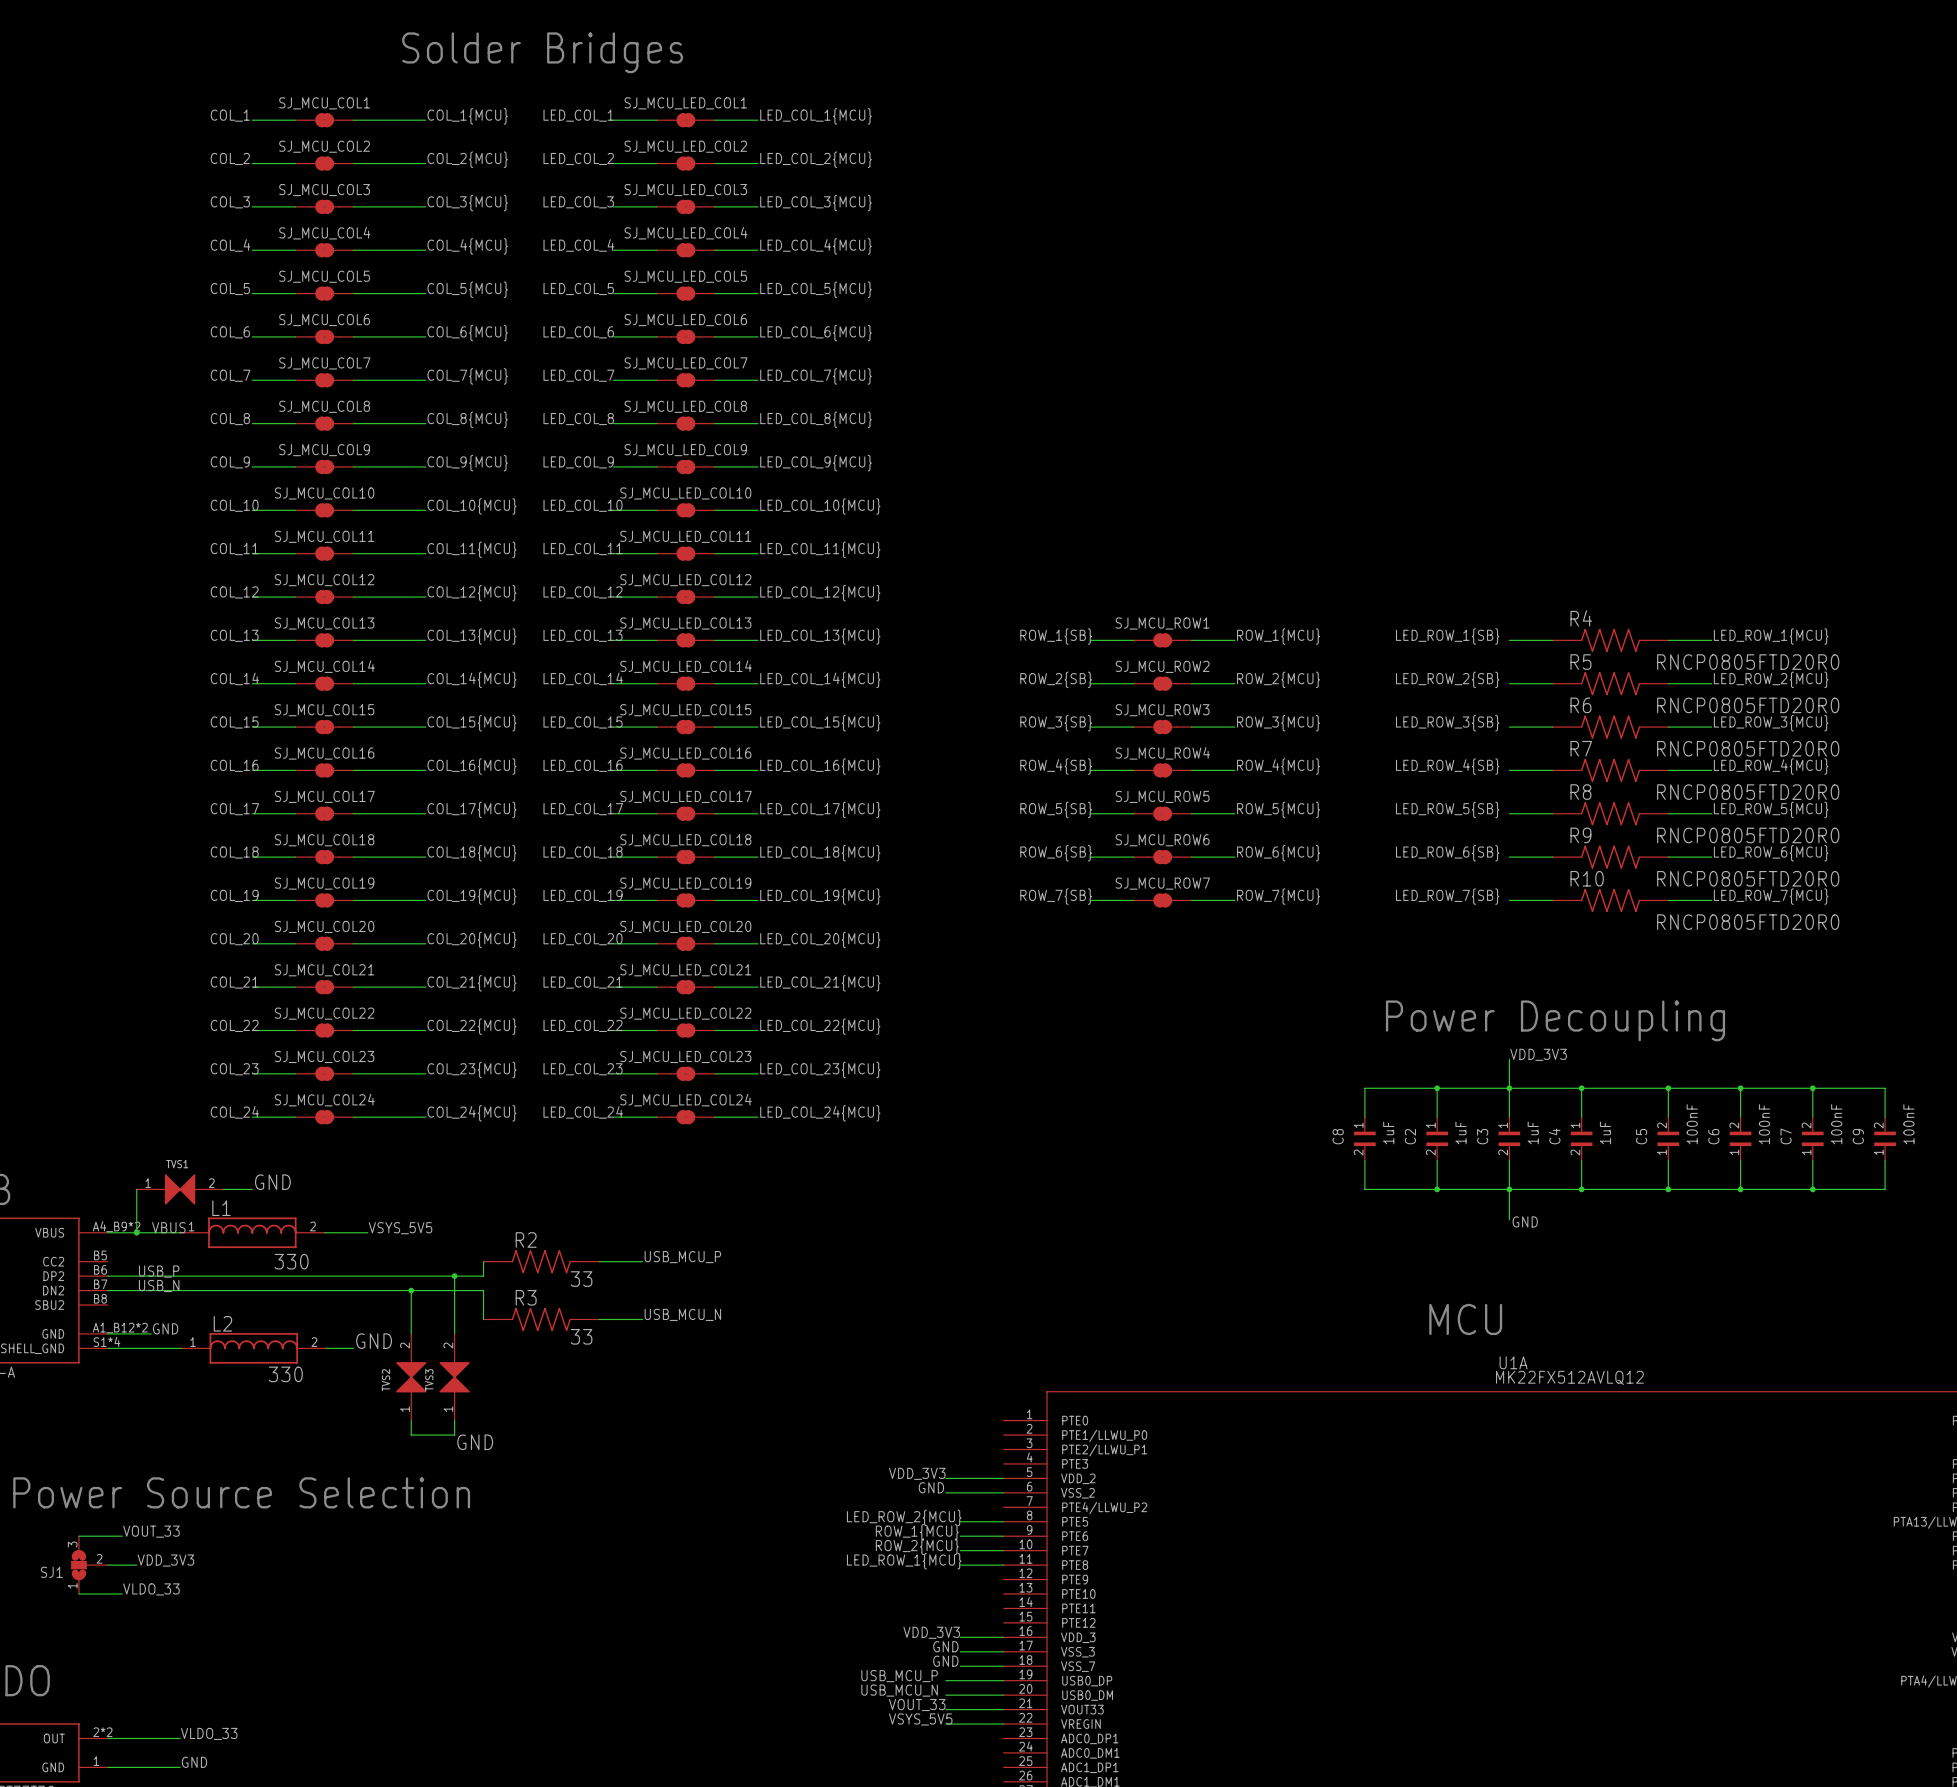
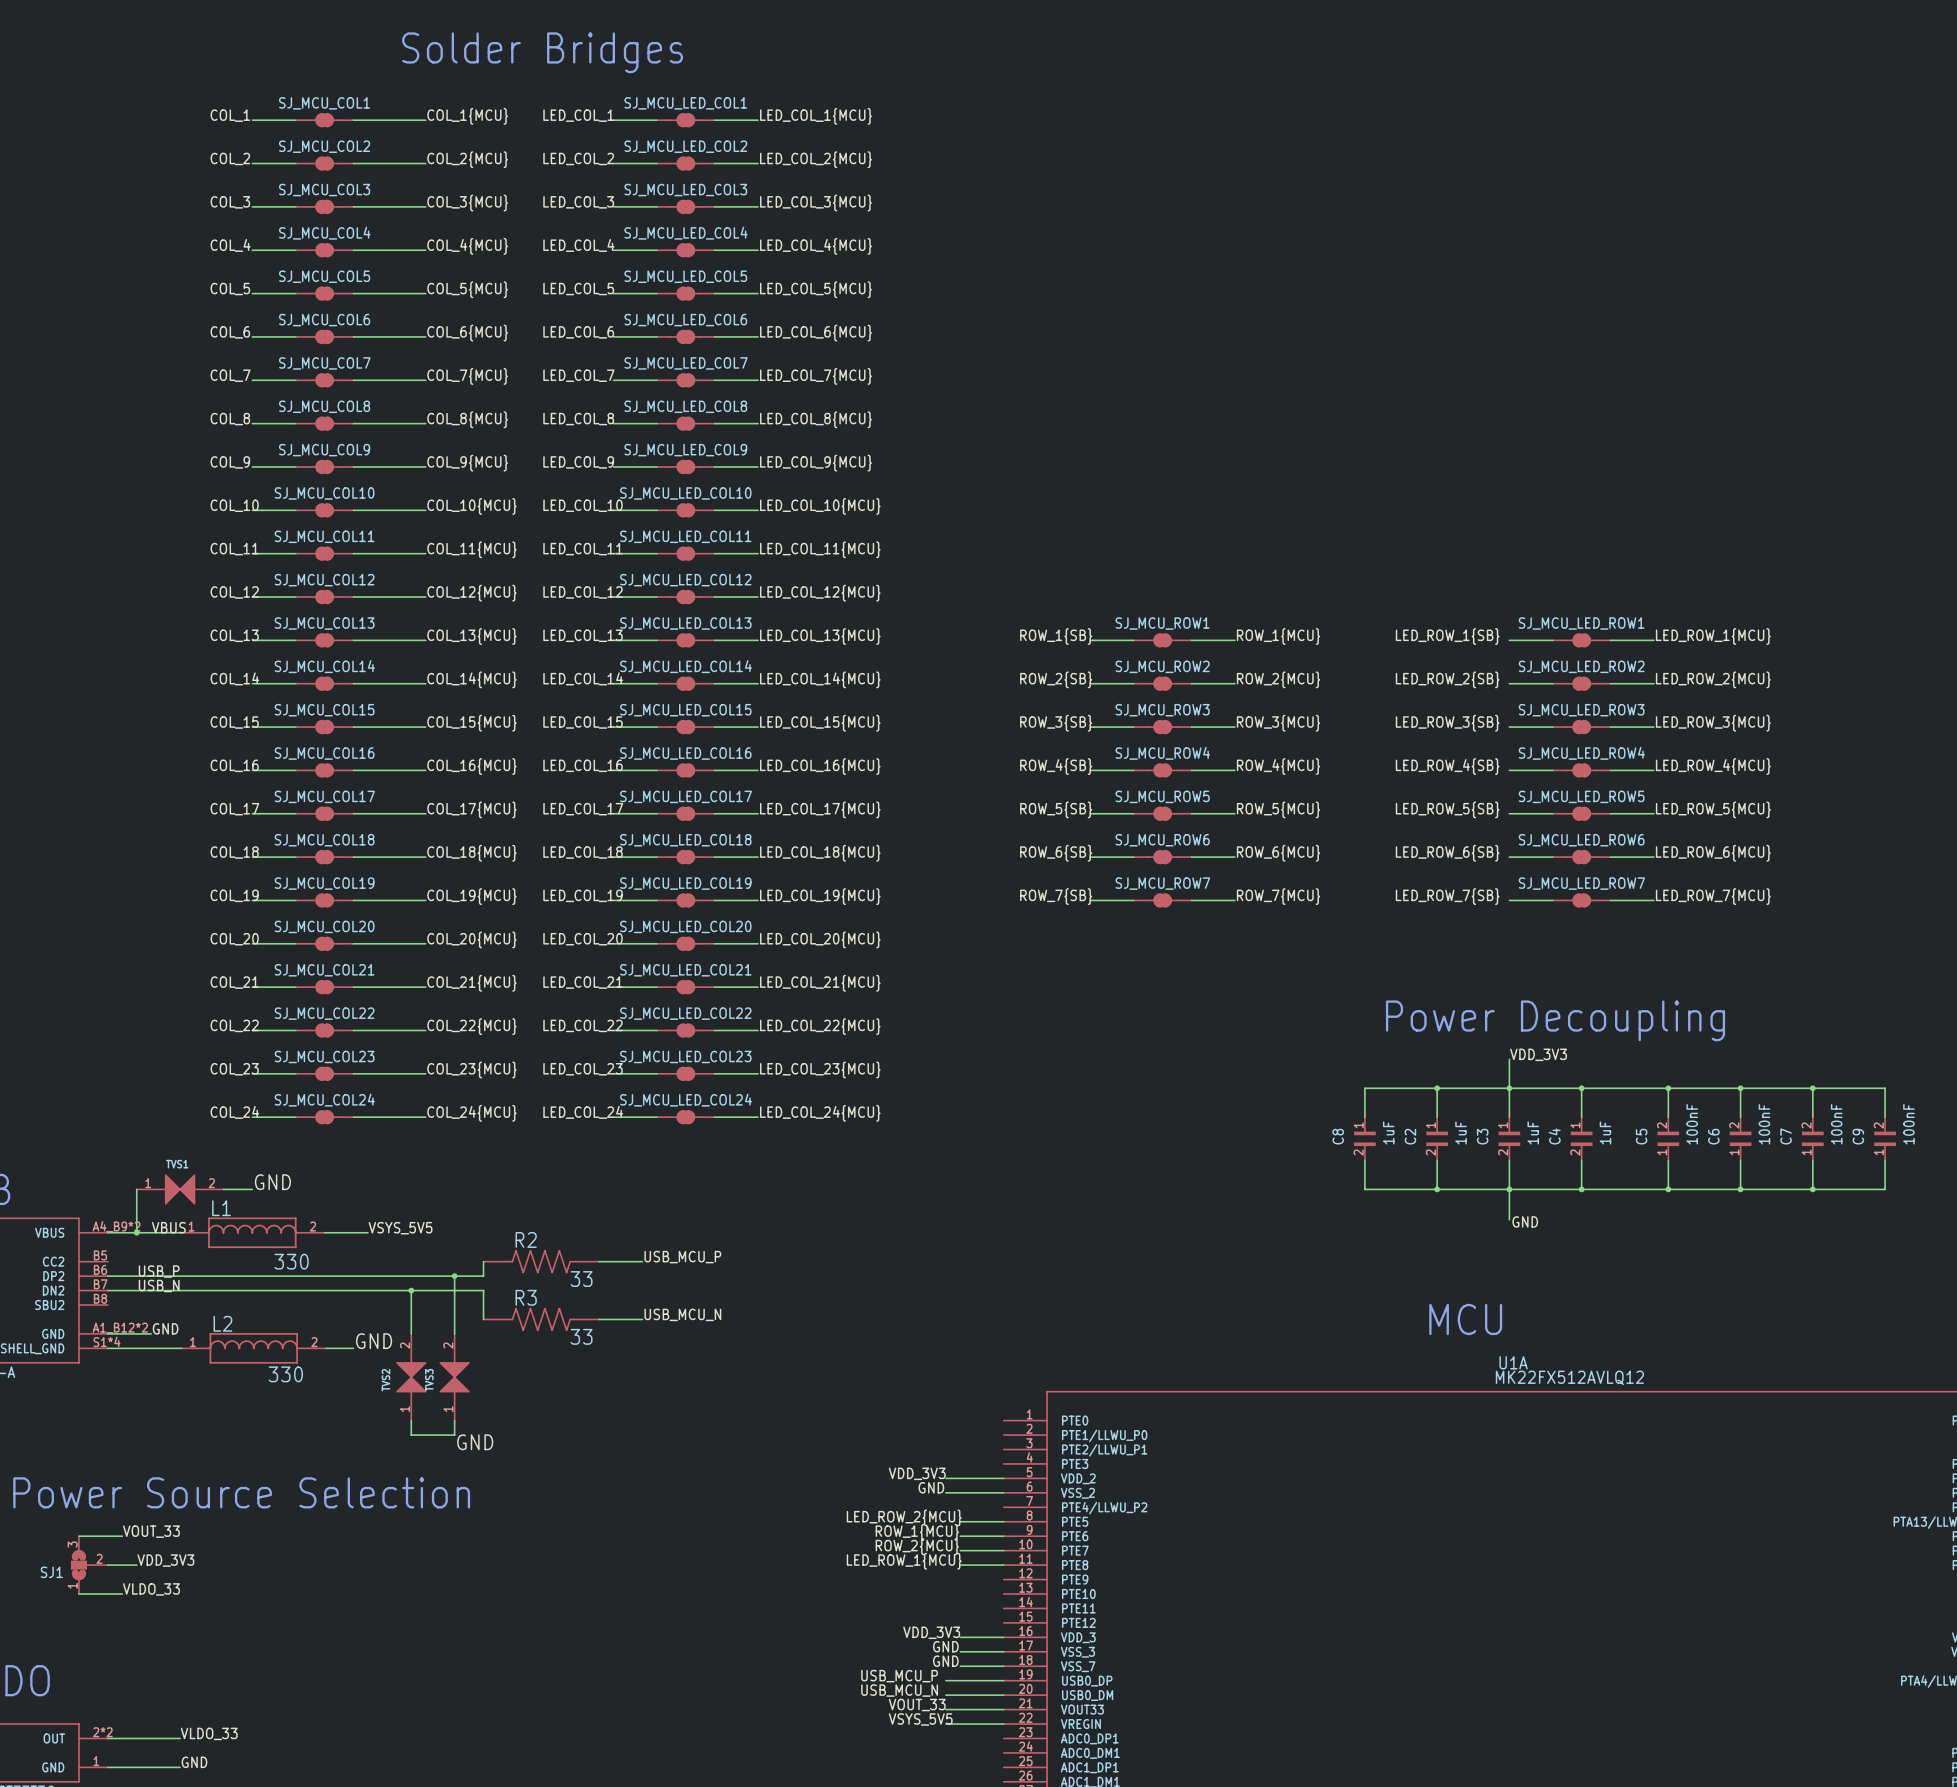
label position: LED_ROW_1{MCU} (1771, 636) -> LED_ROW_1{MCU} (1713, 636)
SJ_MCU_LED_ROW1: none -> (1581, 640)
R4: RNCP0805FTD20R0 (1610, 640) -> none
label position: LED_ROW_2{MCU} (1771, 679) -> LED_ROW_2{MCU} (1713, 679)
SJ_MCU_LED_ROW2: none -> (1581, 683)
R5: RNCP0805FTD20R0 (1610, 683) -> none
label position: LED_ROW_3{MCU} (1771, 723) -> LED_ROW_3{MCU} (1713, 723)
SJ_MCU_LED_ROW3: none -> (1581, 727)
R6: RNCP0805FTD20R0 (1610, 727) -> none
label position: LED_ROW_4{MCU} (1771, 766) -> LED_ROW_4{MCU} (1713, 766)
SJ_MCU_LED_ROW4: none -> (1581, 770)
R7: RNCP0805FTD20R0 (1610, 770) -> none
label position: LED_ROW_5{MCU} (1771, 809) -> LED_ROW_5{MCU} (1713, 809)
SJ_MCU_LED_ROW5: none -> (1581, 813)
R8: RNCP0805FTD20R0 (1610, 813) -> none
label position: LED_ROW_6{MCU} (1771, 853) -> LED_ROW_6{MCU} (1713, 853)
SJ_MCU_LED_ROW6: none -> (1581, 857)
R9: RNCP0805FTD20R0 (1610, 857) -> none
label position: LED_ROW_7{MCU} (1771, 896) -> LED_ROW_7{MCU} (1713, 896)
SJ_MCU_LED_ROW7: none -> (1581, 900)
R10: RNCP0805FTD20R0 (1610, 900) -> none

